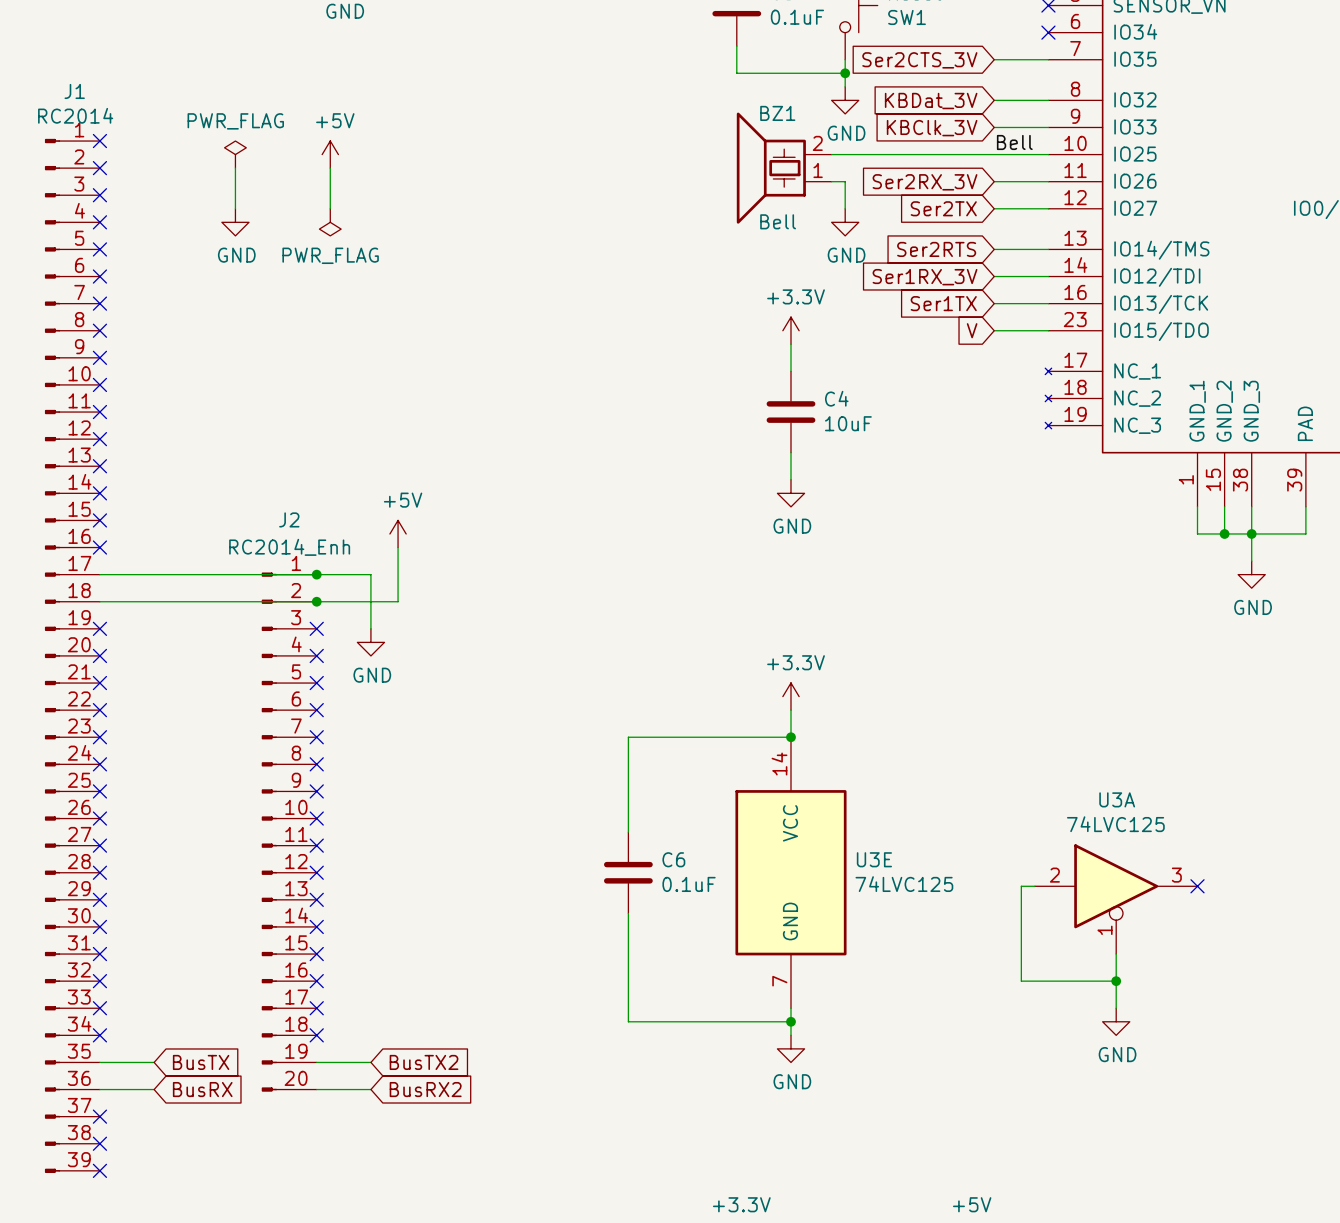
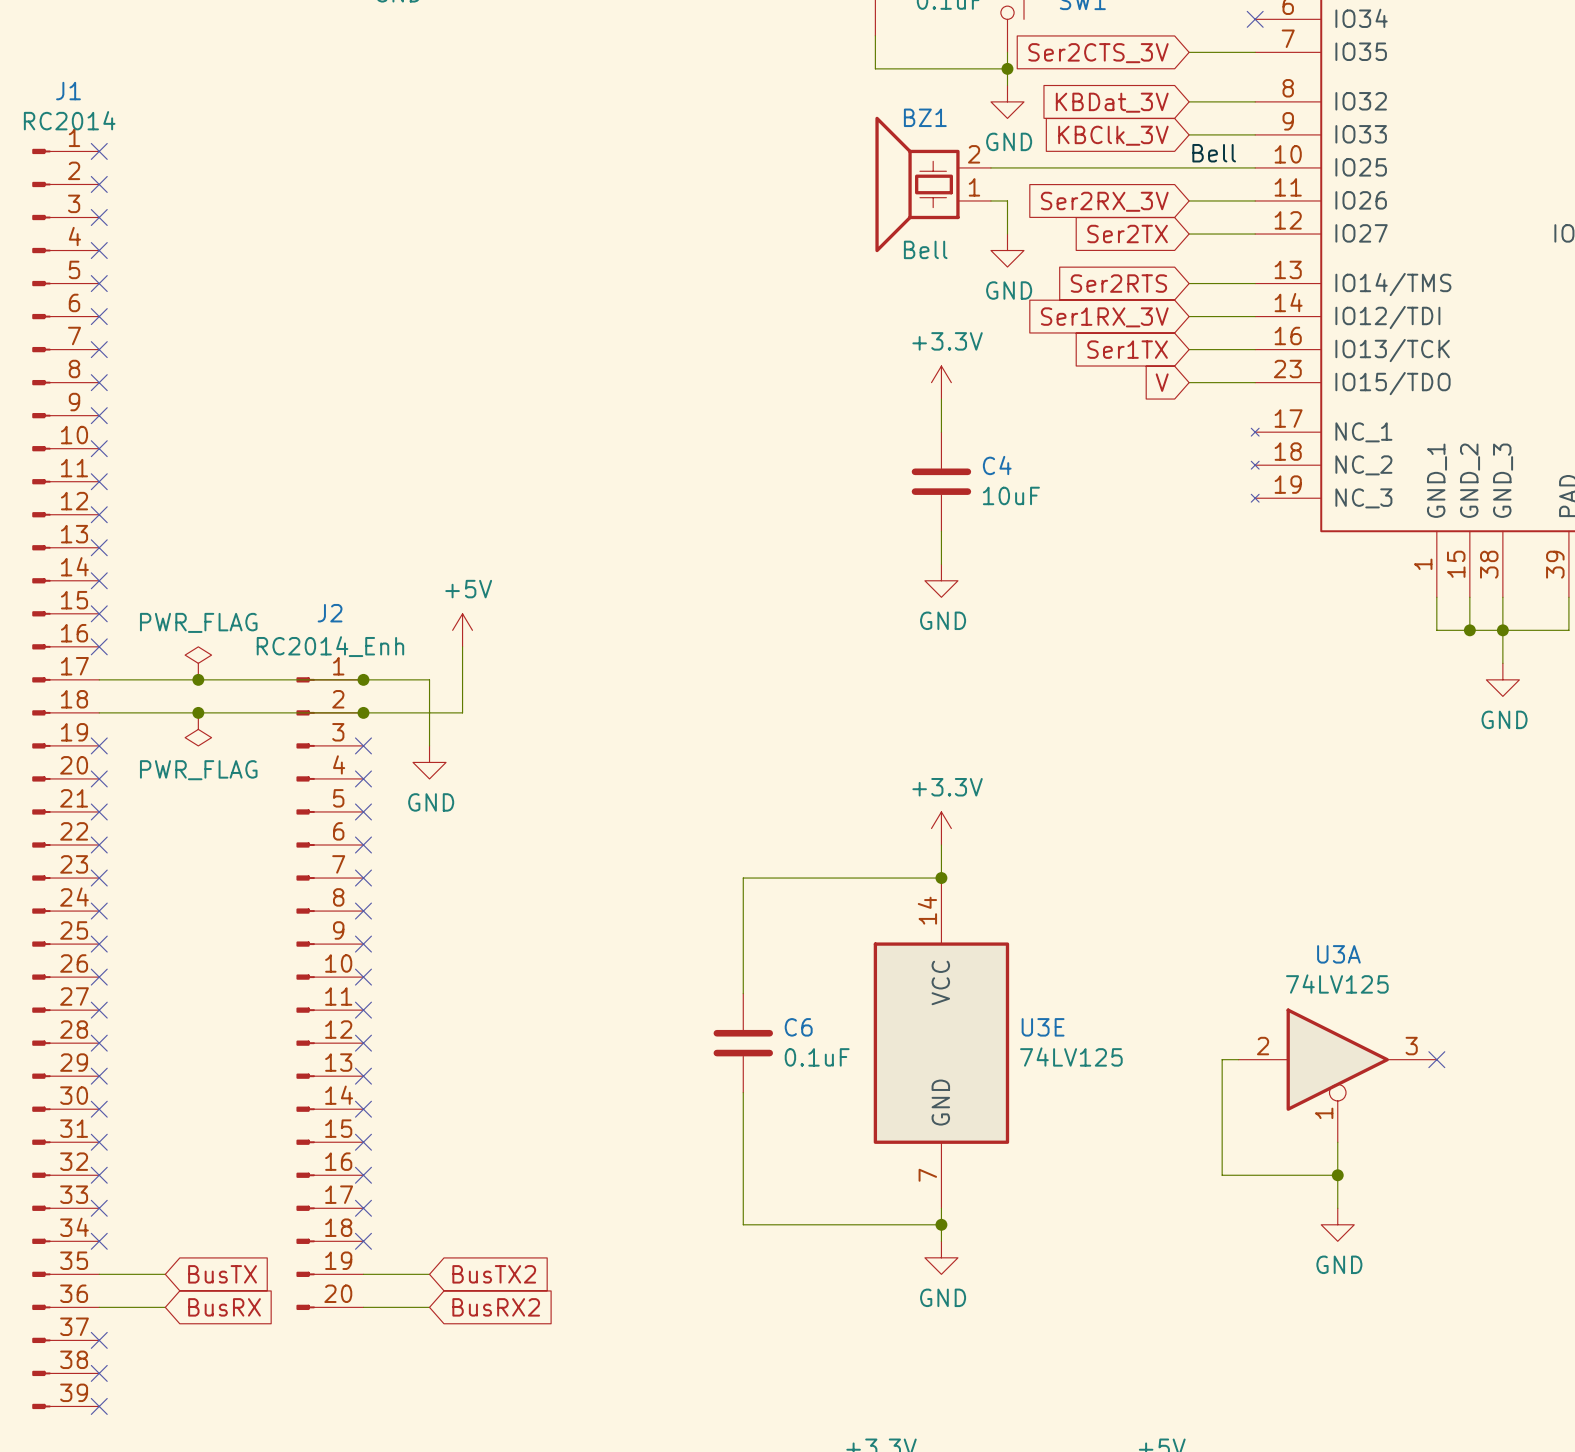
power symbol: PWR_FLAG (235, 154) -> none
power symbol: +5V (330, 154) -> none
wire: (235, 168) (235, 208) -> none
wire: (330, 168) (330, 208) -> none
power symbol: GND (235, 222) -> none
power symbol: PWR_FLAG (330, 222) -> none
power symbol: none -> PWR_FLAG (198, 663)
junction: none -> (198, 679)
junction: none -> (198, 712)
power symbol: none -> PWR_FLAG (198, 729)
U3A value: 74LVC125 (1115, 824) -> 74LV125 (1337, 984)
U3E value: 74LVC125 (904, 884) -> 74LV125 (1071, 1057)

